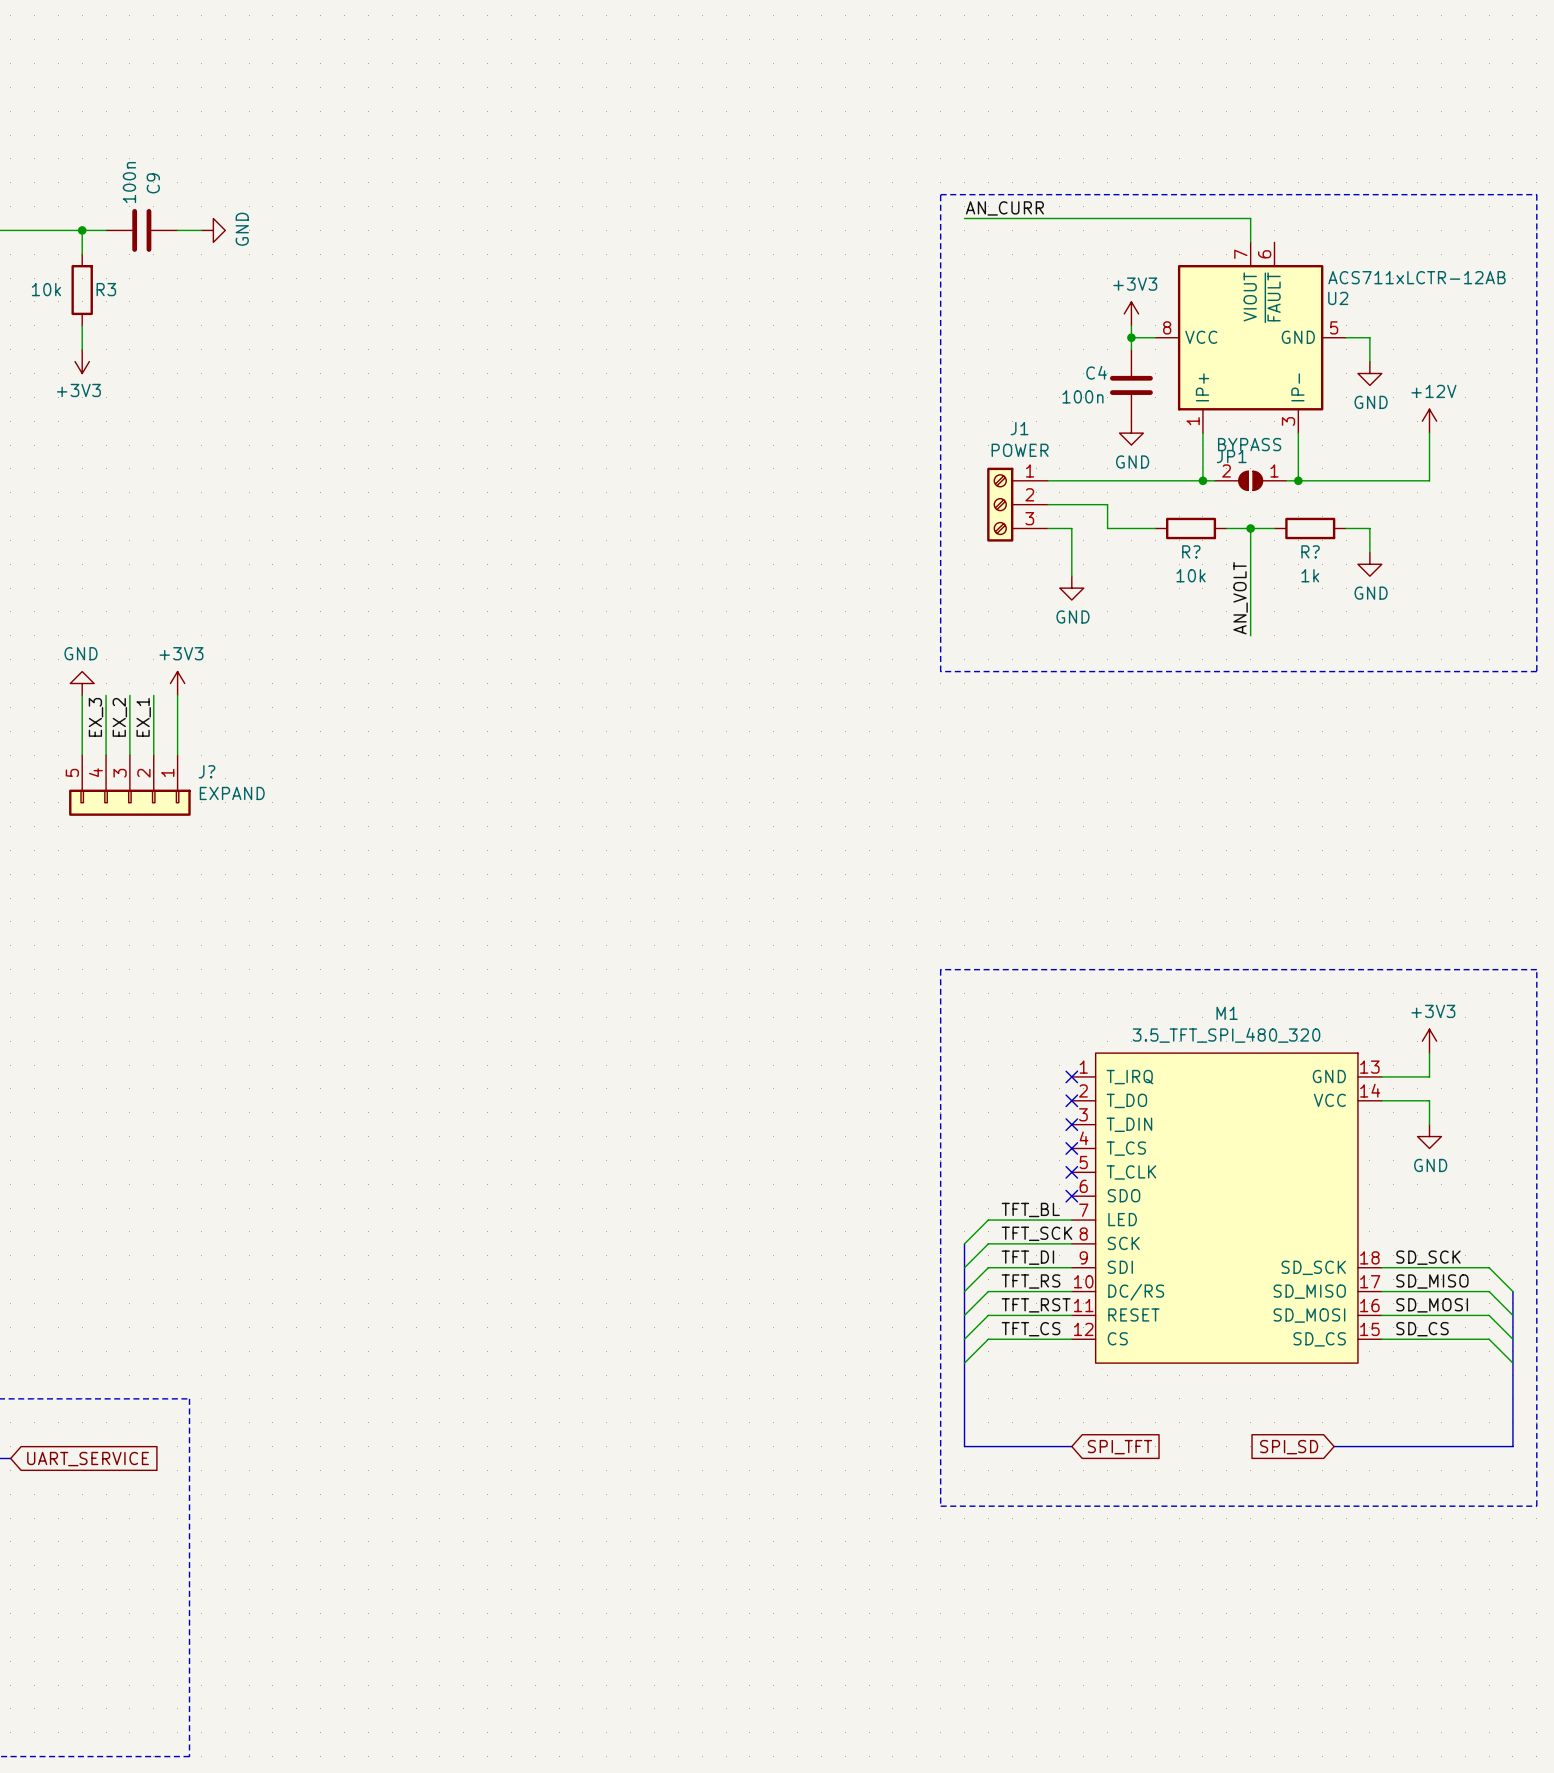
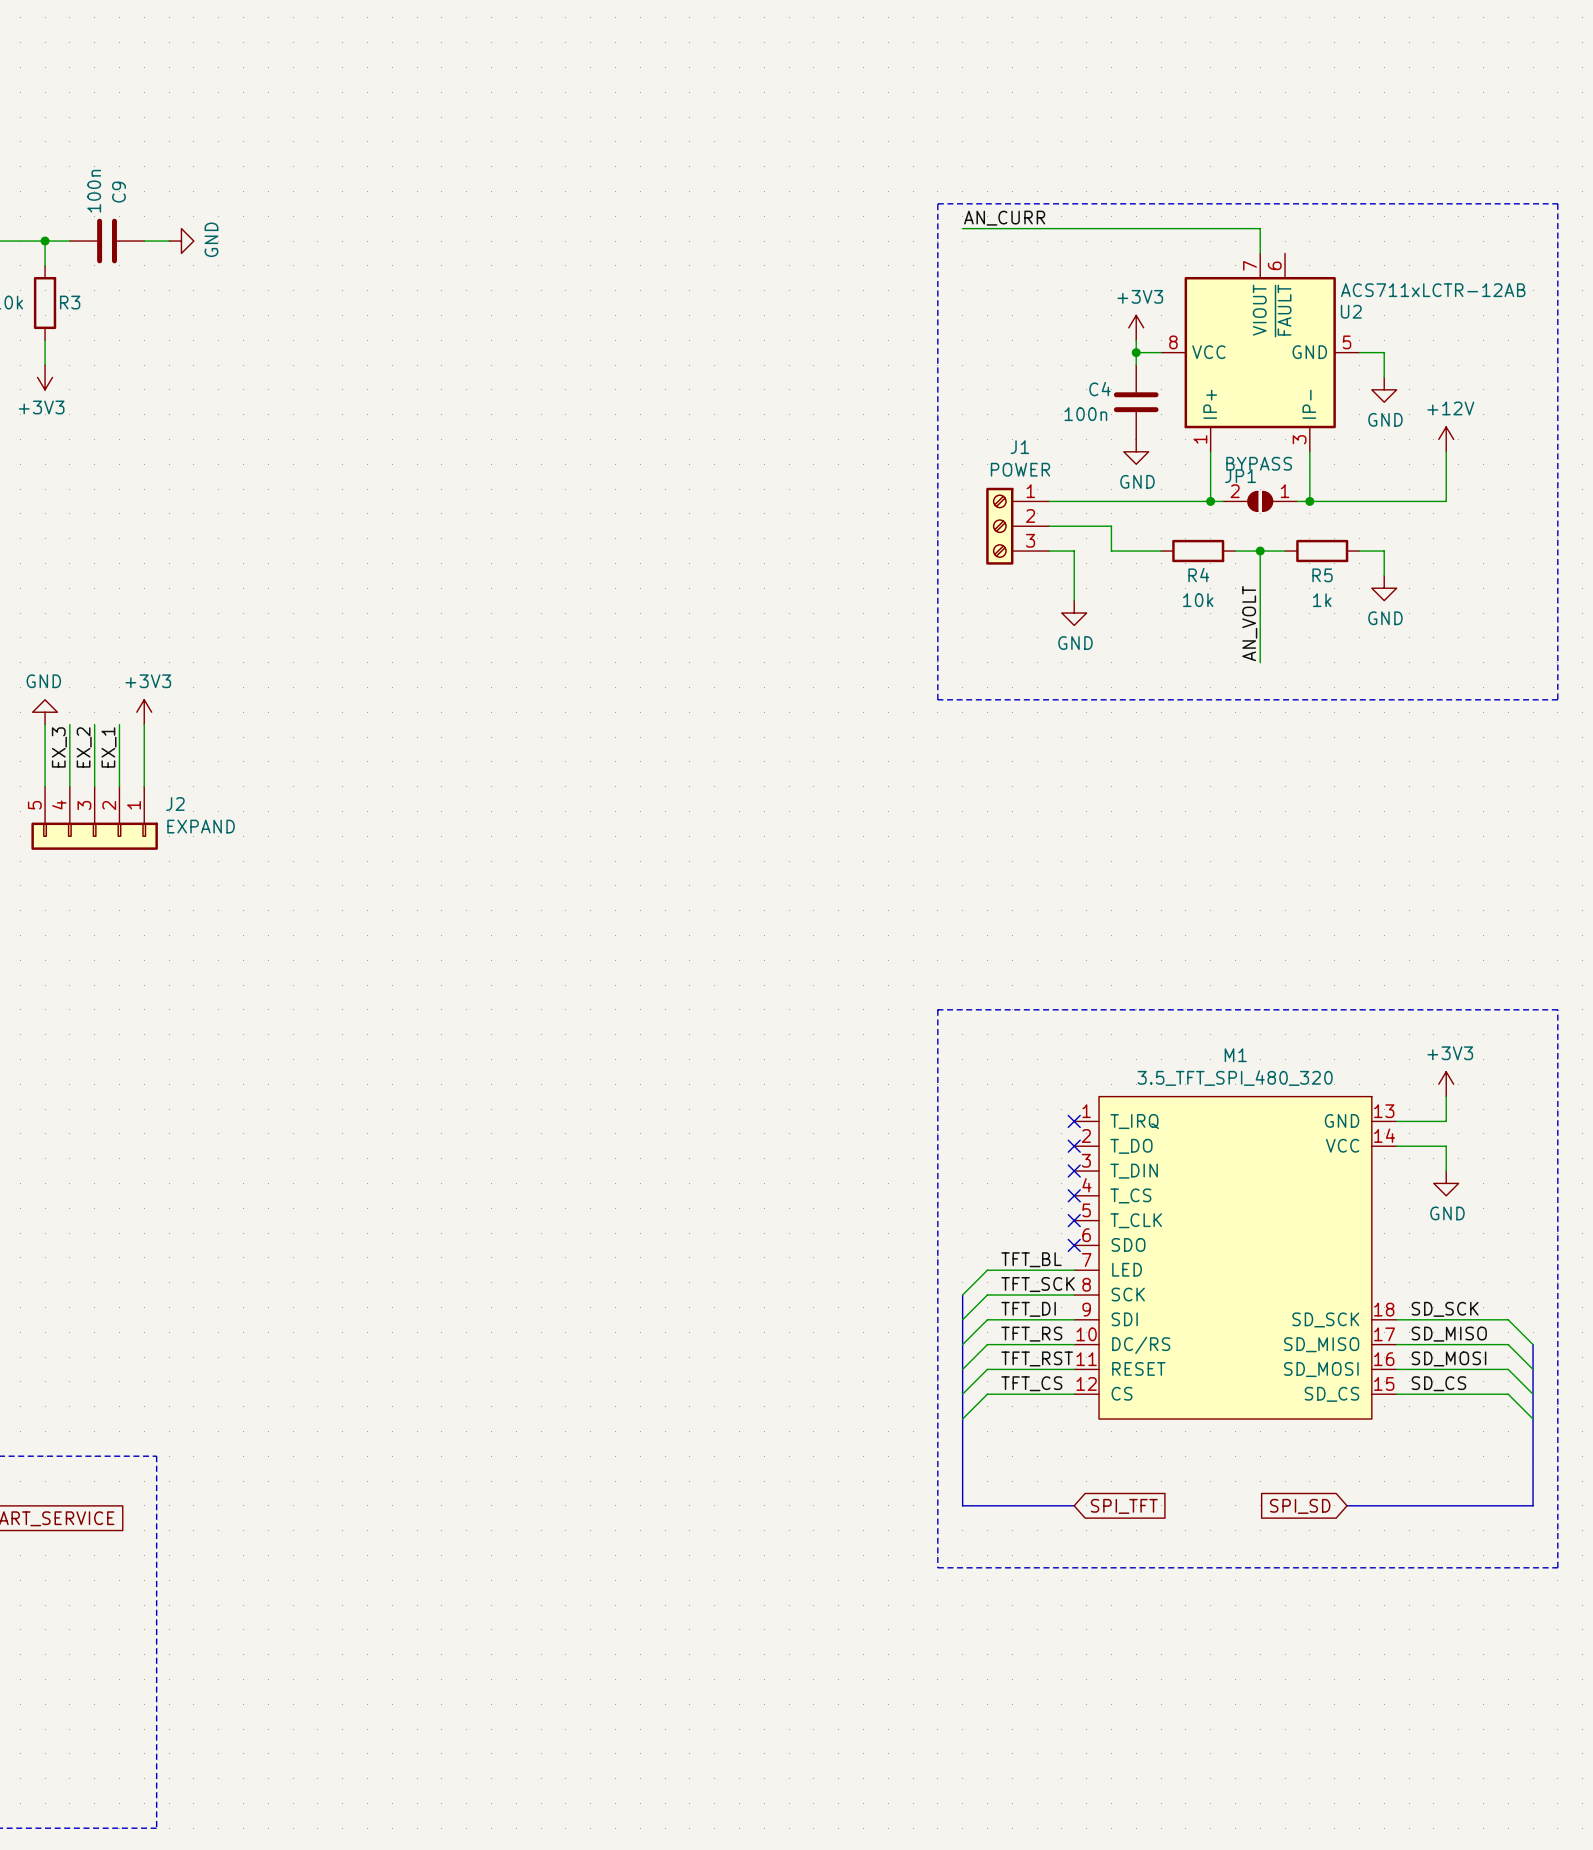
R? name: R? (1191, 551) -> R4 (1198, 575)
R? name: R? (1310, 551) -> R5 (1322, 575)
J? name: J? (206, 771) -> J2 (175, 804)

